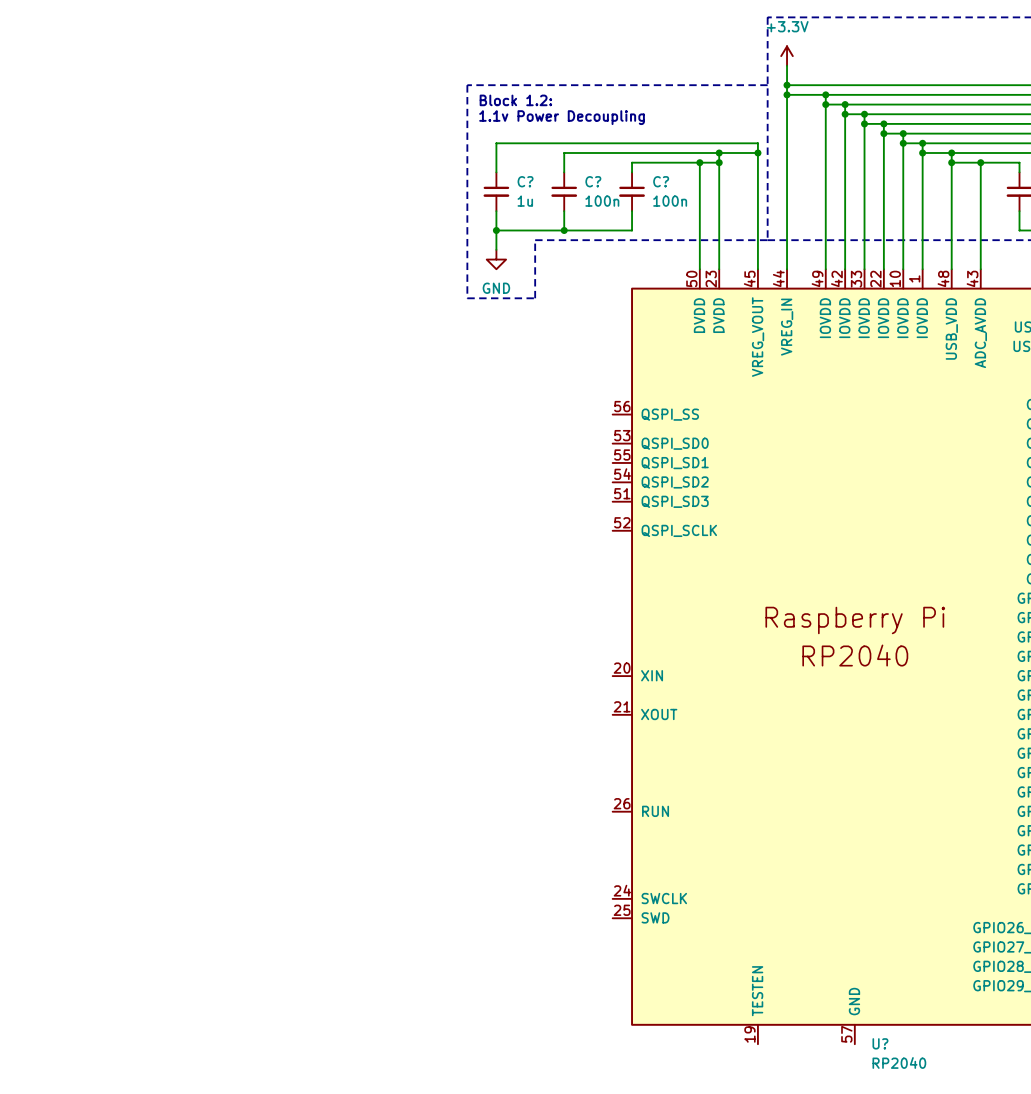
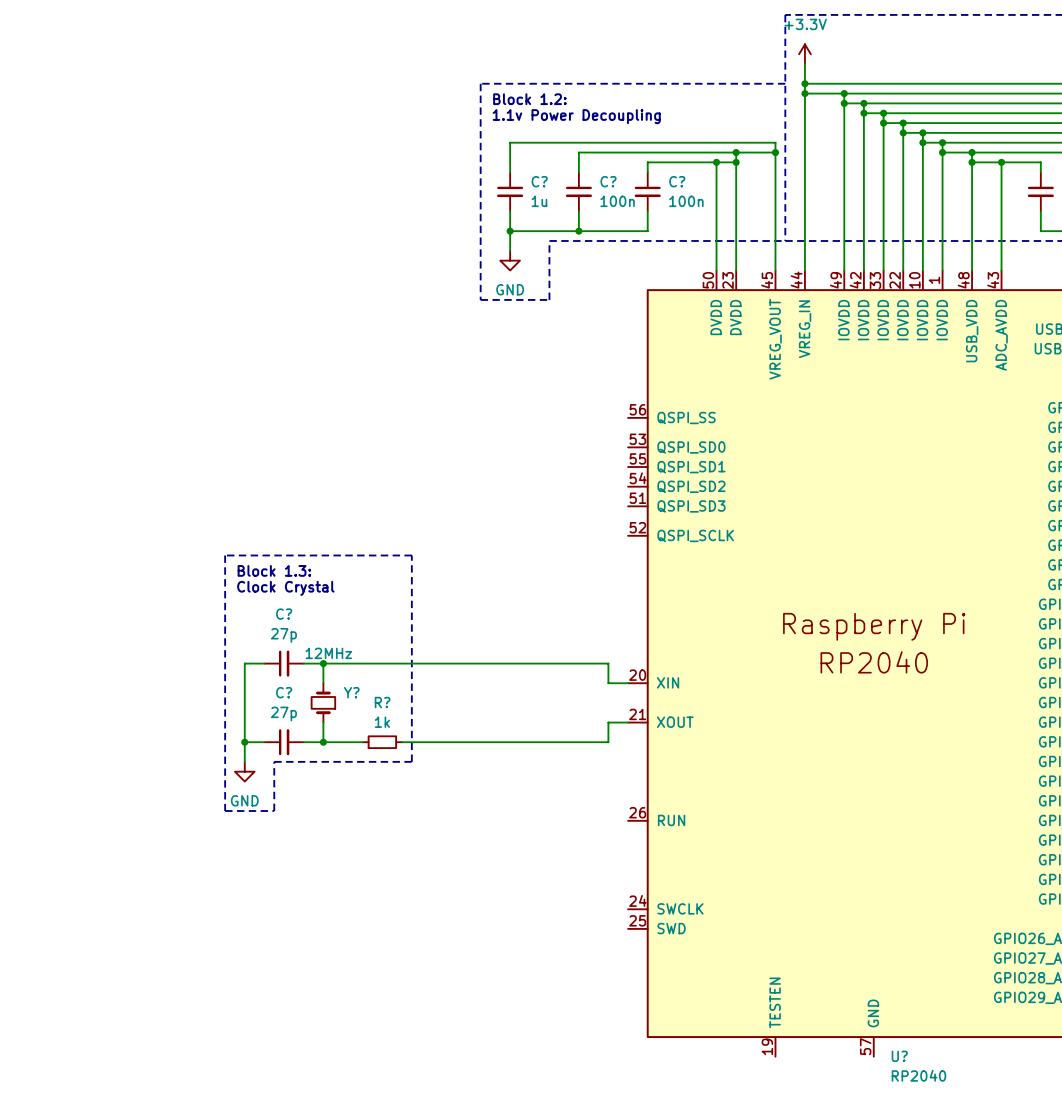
line: none -> (225, 555) (411, 555) (411, 761) (274, 761) (274, 811) (225, 811) (225, 555)
text: none -> Block 1.3: (274, 570)
text: none -> Clock Crystal (285, 588)
wire: none -> (264, 663) (244, 663) (244, 761)
C?: none -> 27p (284, 663)
wire: none -> (303, 663) (608, 663) (608, 683) (628, 683)
wire: none -> (323, 663) (323, 683)
junction: none -> (323, 663)
Y?: none -> 12MHz (323, 702)
wire: none -> (323, 722) (323, 742)
wire: none -> (628, 722) (608, 722) (608, 742) (402, 742)
wire: none -> (244, 742) (264, 742)
junction: none -> (244, 742)
C?: none -> 27p (284, 742)
wire: none -> (303, 742) (362, 742)
junction: none -> (323, 742)
R?: none -> 1k (382, 742)
power symbol: none -> GND (244, 771)

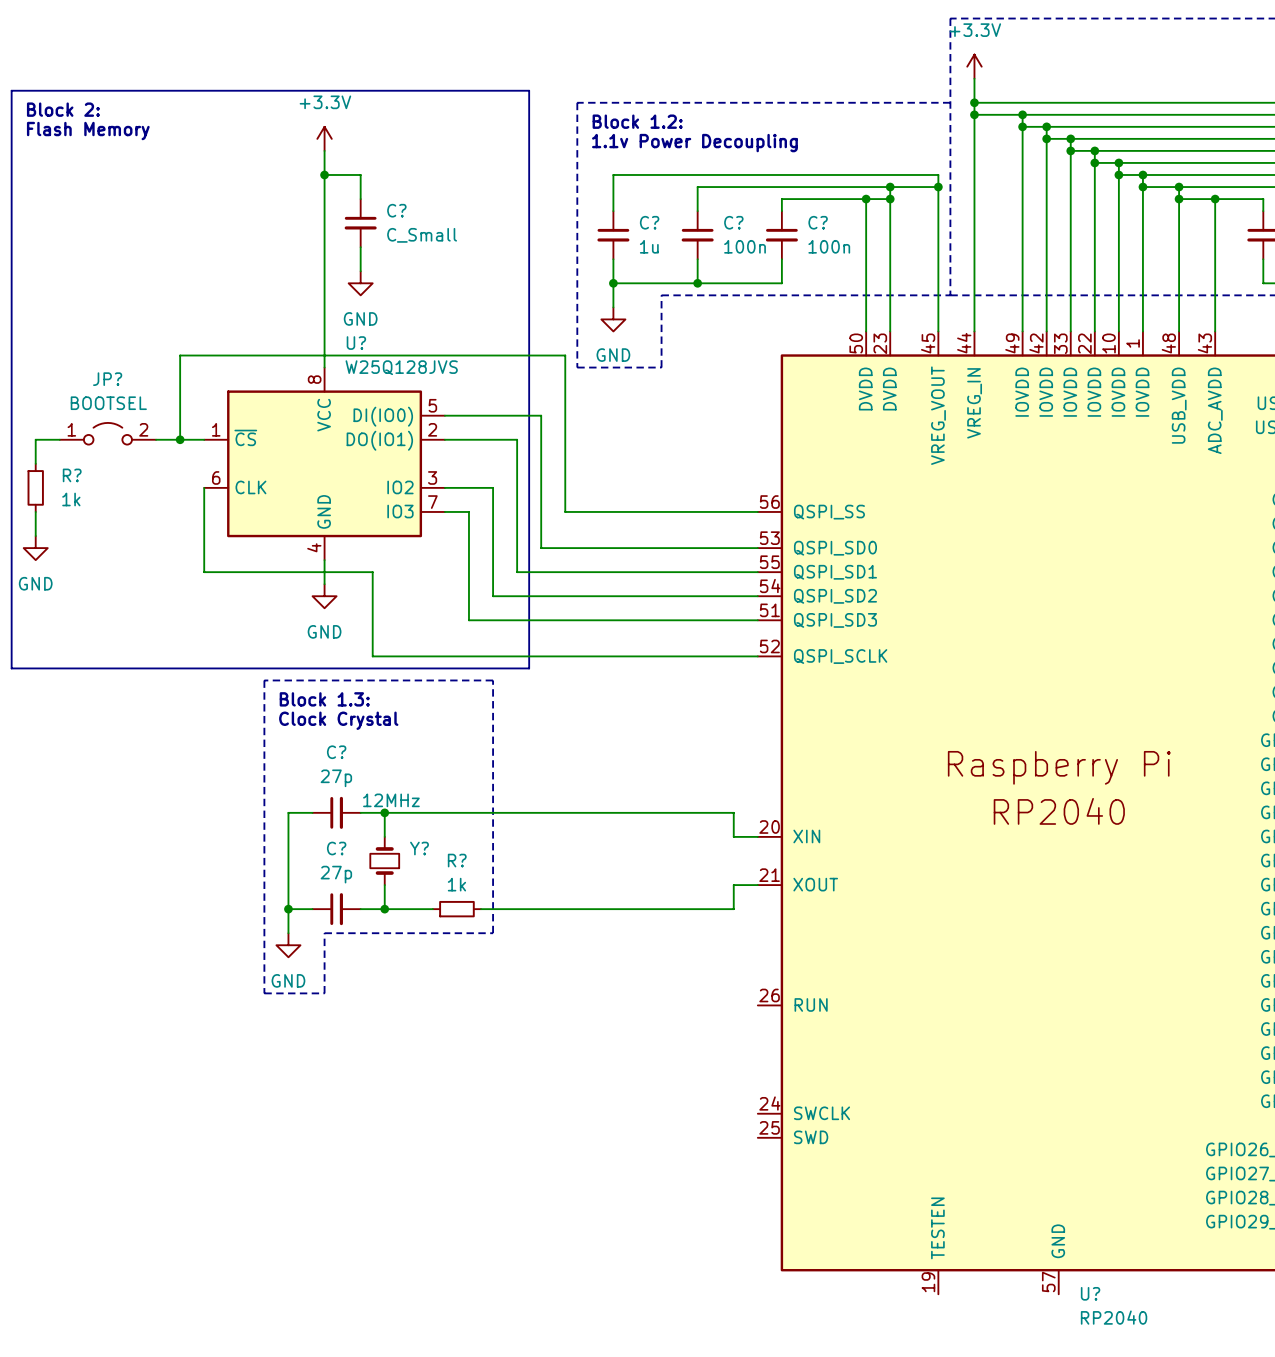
line: none -> (11, 90) (11, 668) (529, 668) (529, 90) (11, 90)
text: none -> Block 2: (63, 109)
text: none -> Flash Memory (88, 131)
power symbol: none -> +3.3V (324, 138)
wire: none -> (324, 150) (324, 367)
wire: none -> (324, 174) (360, 174) (360, 199)
junction: none -> (324, 174)
C?: none -> C_Small (360, 223)
wire: none -> (360, 247) (360, 271)
power symbol: none -> GND (360, 283)
wire: none -> (444, 415) (541, 415) (541, 548) (757, 548)
JP?: none -> BOOTSEL (107, 433)
wire: none -> (59, 439) (35, 439) (35, 463)
wire: none -> (156, 439) (204, 439)
wire: none -> (180, 439) (180, 355) (565, 355) (565, 511) (757, 511)
junction: none -> (180, 439)
wire: none -> (444, 439) (517, 439) (517, 572) (757, 572)
U?: none -> W25Q128JVS (324, 463)
R?: none -> 1k (35, 487)
wire: none -> (204, 487) (204, 572) (372, 572) (372, 656) (757, 656)
wire: none -> (444, 487) (493, 487) (493, 596) (757, 596)
wire: none -> (35, 511) (35, 536)
wire: none -> (444, 511) (468, 511) (468, 620) (757, 620)
power symbol: none -> GND (35, 548)
wire: none -> (324, 560) (324, 584)
power symbol: none -> GND (324, 596)

